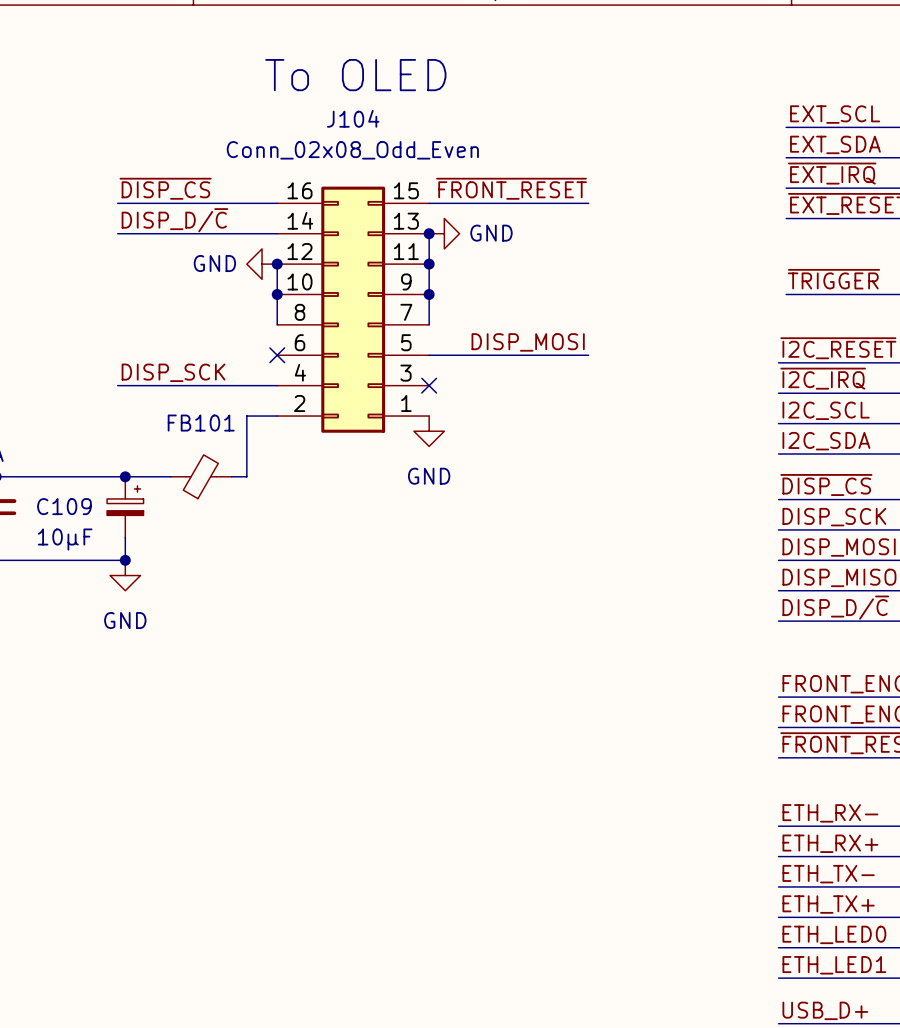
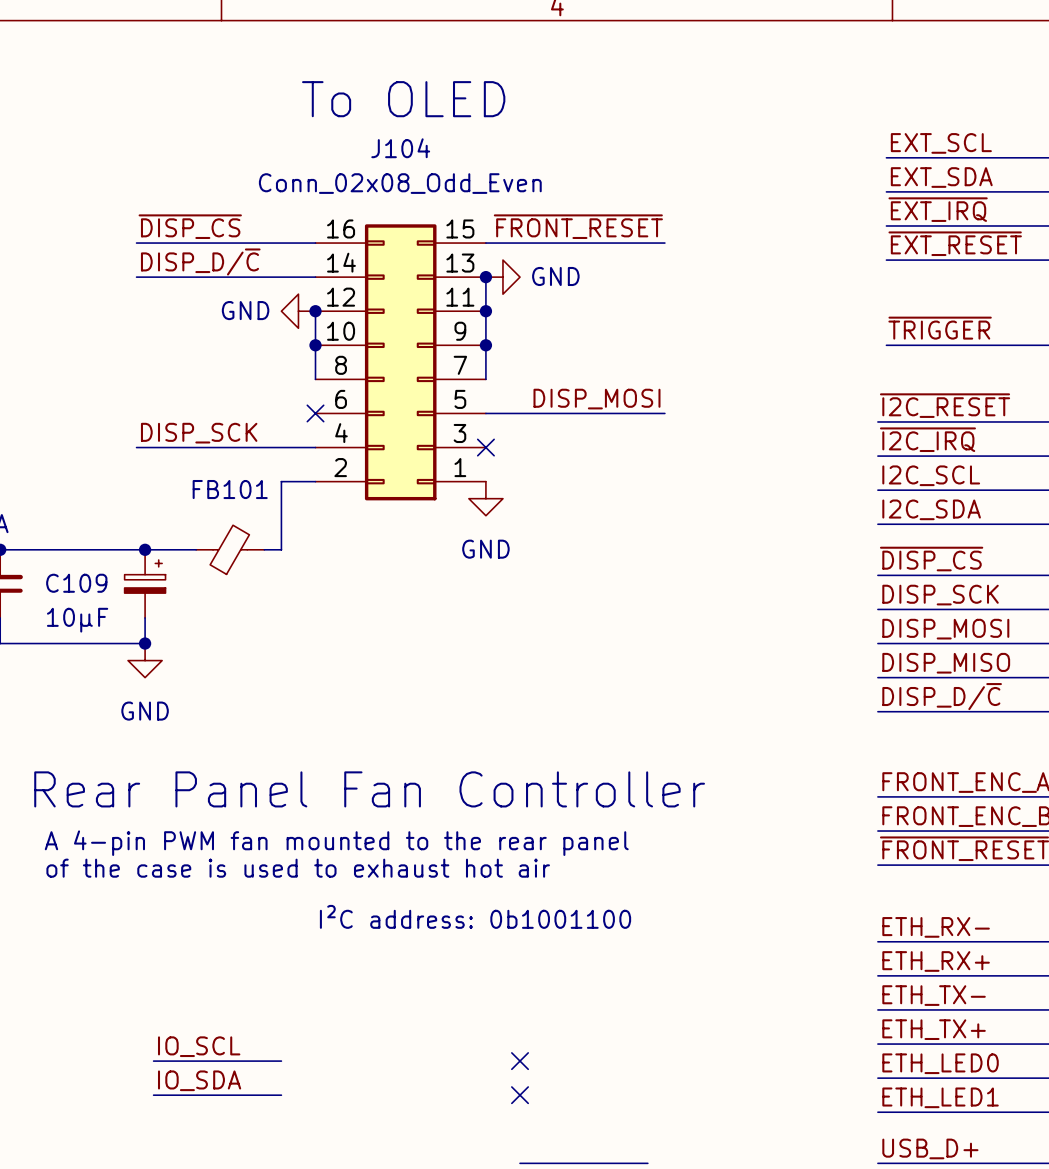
text: none -> Rear Panel Fan Controller (369, 789)
text: none -> A 4-pin PWM fan mounted to the rear panel (336, 843)
text: none -> of the case is used to exhaust hot air (298, 868)
text: none -> I²C address: 0b1001100 (475, 916)
label: none -> IO_SCL (199, 1046)
wire: none -> (153, 1061) (281, 1061)
no-connect mark: none -> (520, 1061)
label: none -> IO_SDA (199, 1080)
wire: none -> (153, 1095) (281, 1095)
no-connect mark: none -> (520, 1095)
wire: none -> (520, 1163) (647, 1163)

